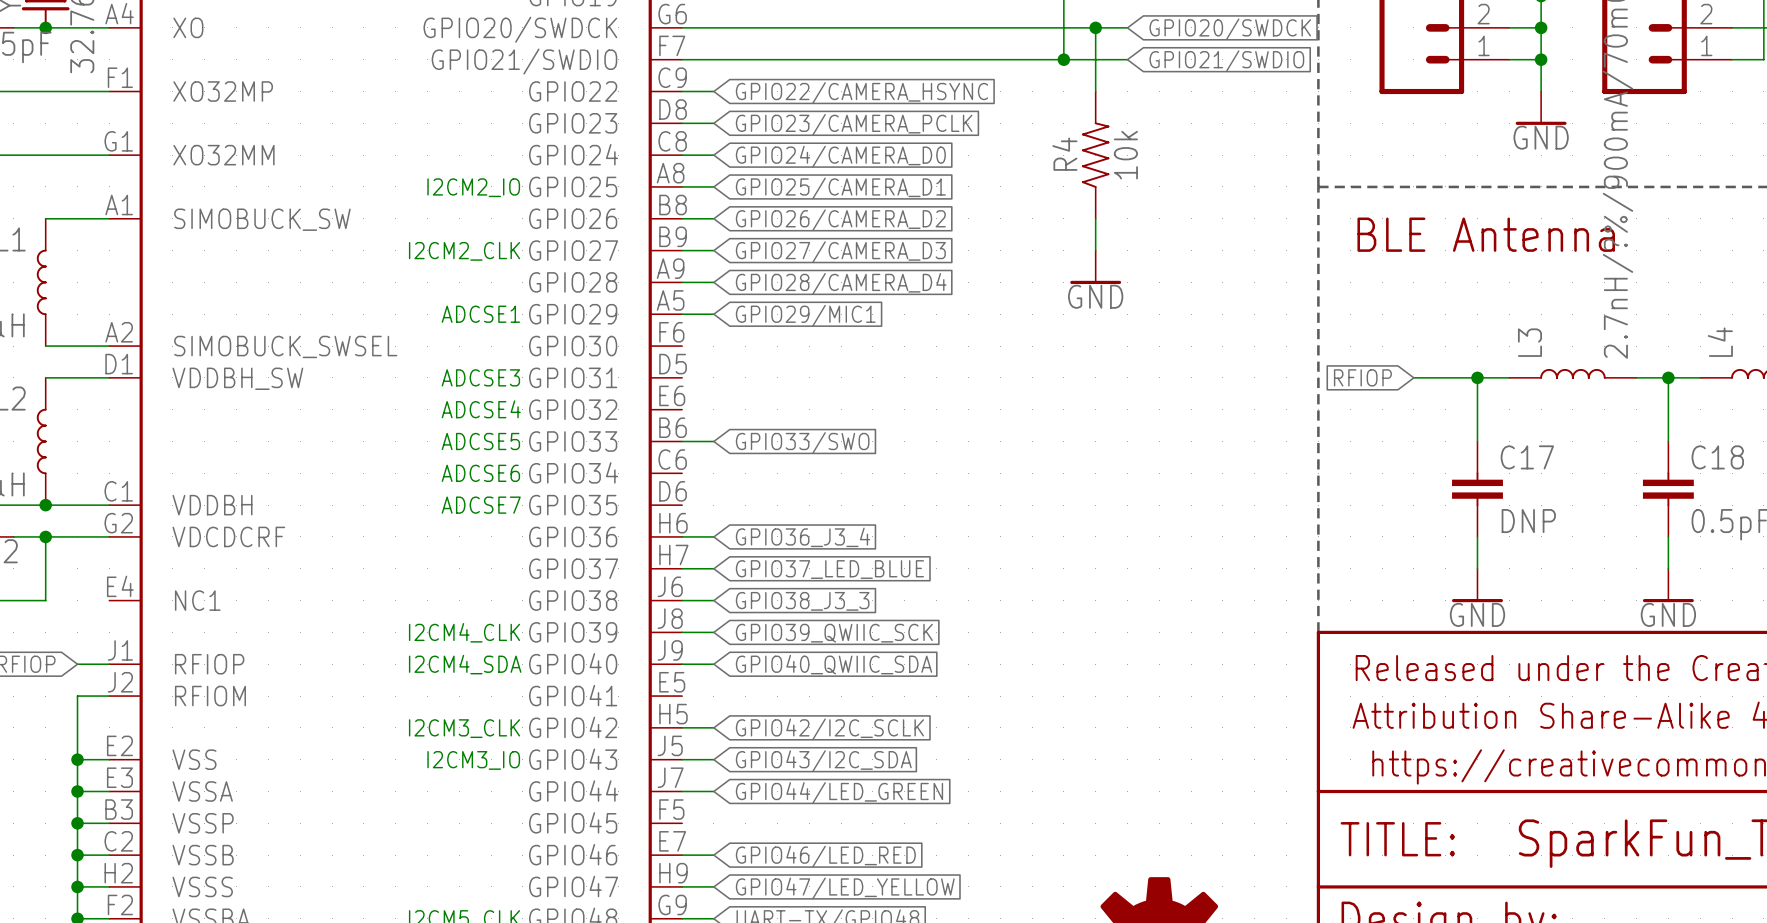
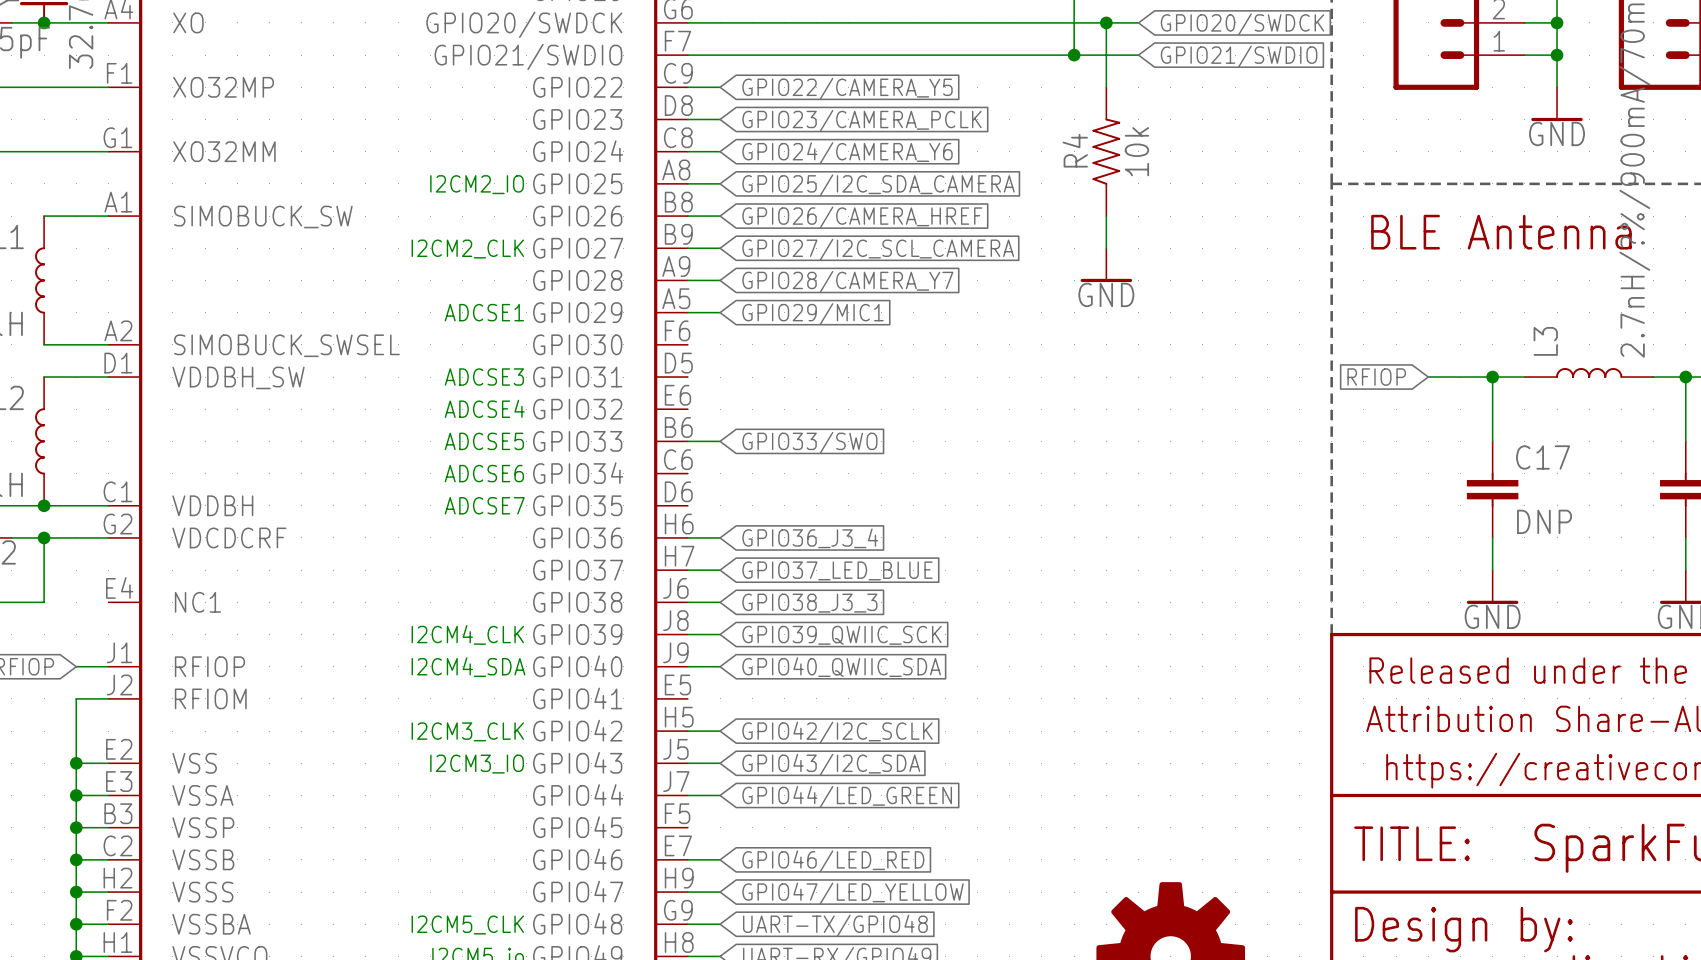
global label: GPIO22/CAMERA_HSYNC (861, 93) -> GPIO22/CAMERA_Y5 (847, 88)
global label: GPIO24/CAMERA_D0 (840, 156) -> GPIO24/CAMERA_Y6 (847, 153)
global label: GPIO25/CAMERA_D1 (840, 188) -> GPIO25/I2C_SDA_CAMERA (878, 185)
global label: GPIO26/CAMERA_D2 (840, 220) -> GPIO26/CAMERA_HREF (862, 217)
global label: GPIO27/CAMERA_D3 (840, 252) -> GPIO27/I2C_SCL_CAMERA (878, 249)
global label: GPIO28/CAMERA_D4 (841, 283) -> GPIO28/CAMERA_Y7 (847, 281)

